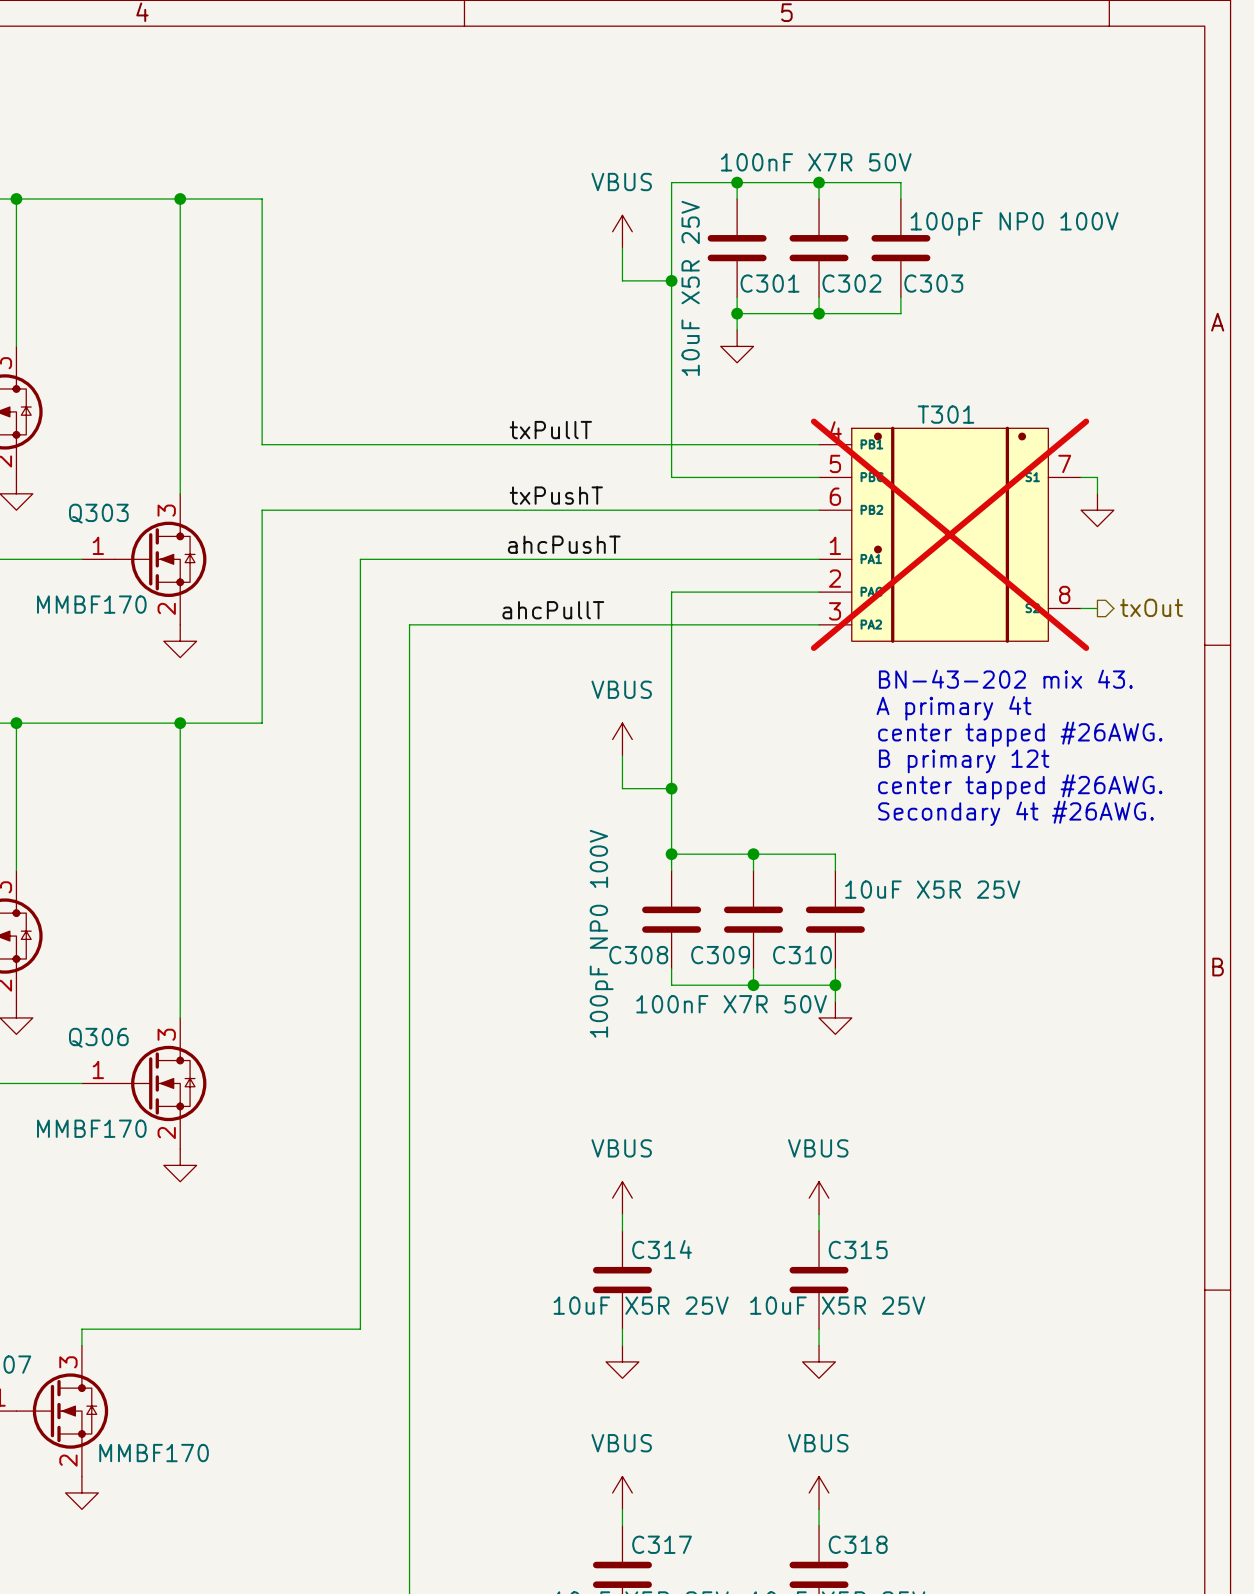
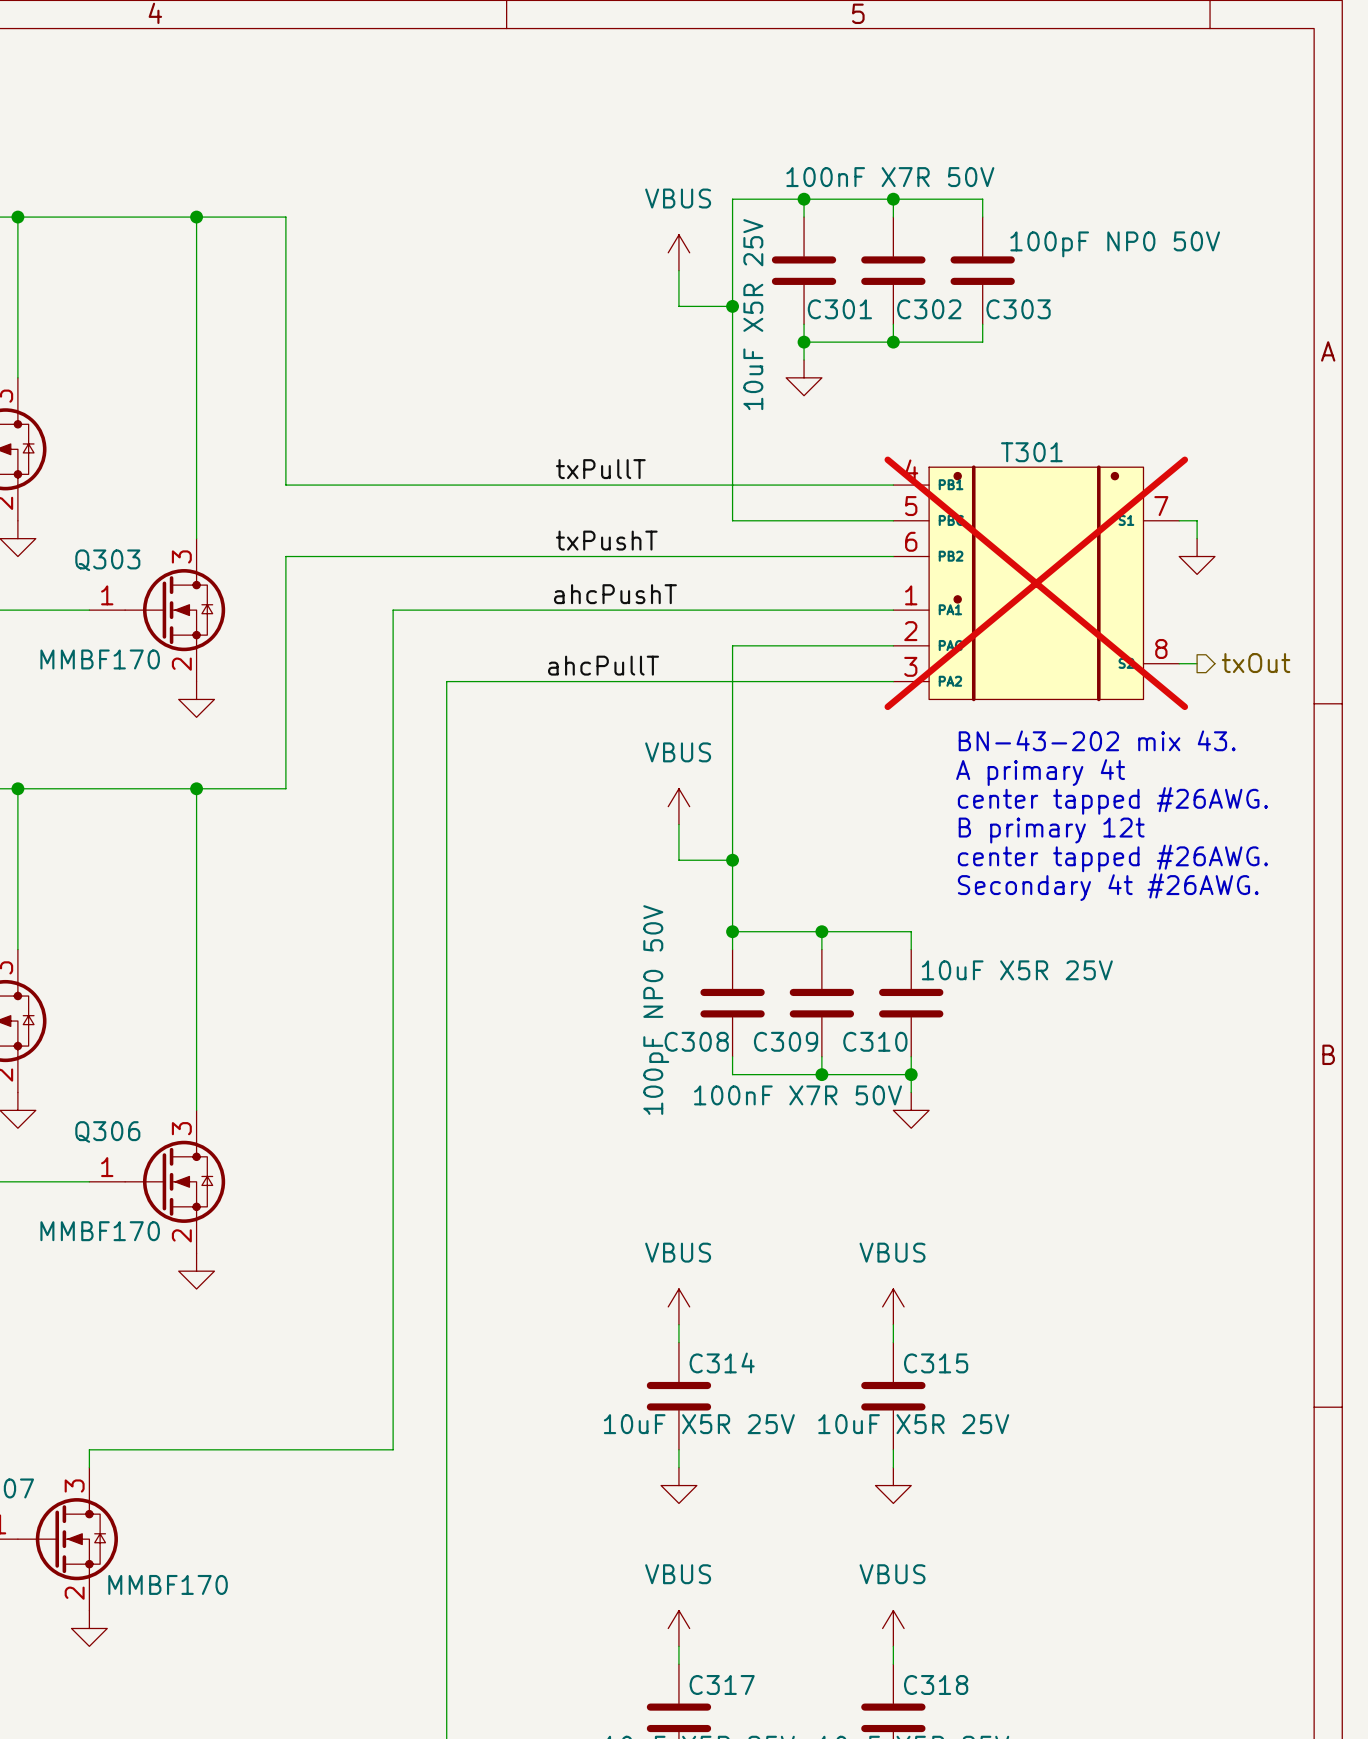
C303 value: 100pF NP0 100V (1014, 224) -> 100pF NP0 50V (1115, 244)
C308 value: 100pF NP0 100V (601, 933) -> 100pF NP0 50V (656, 1010)

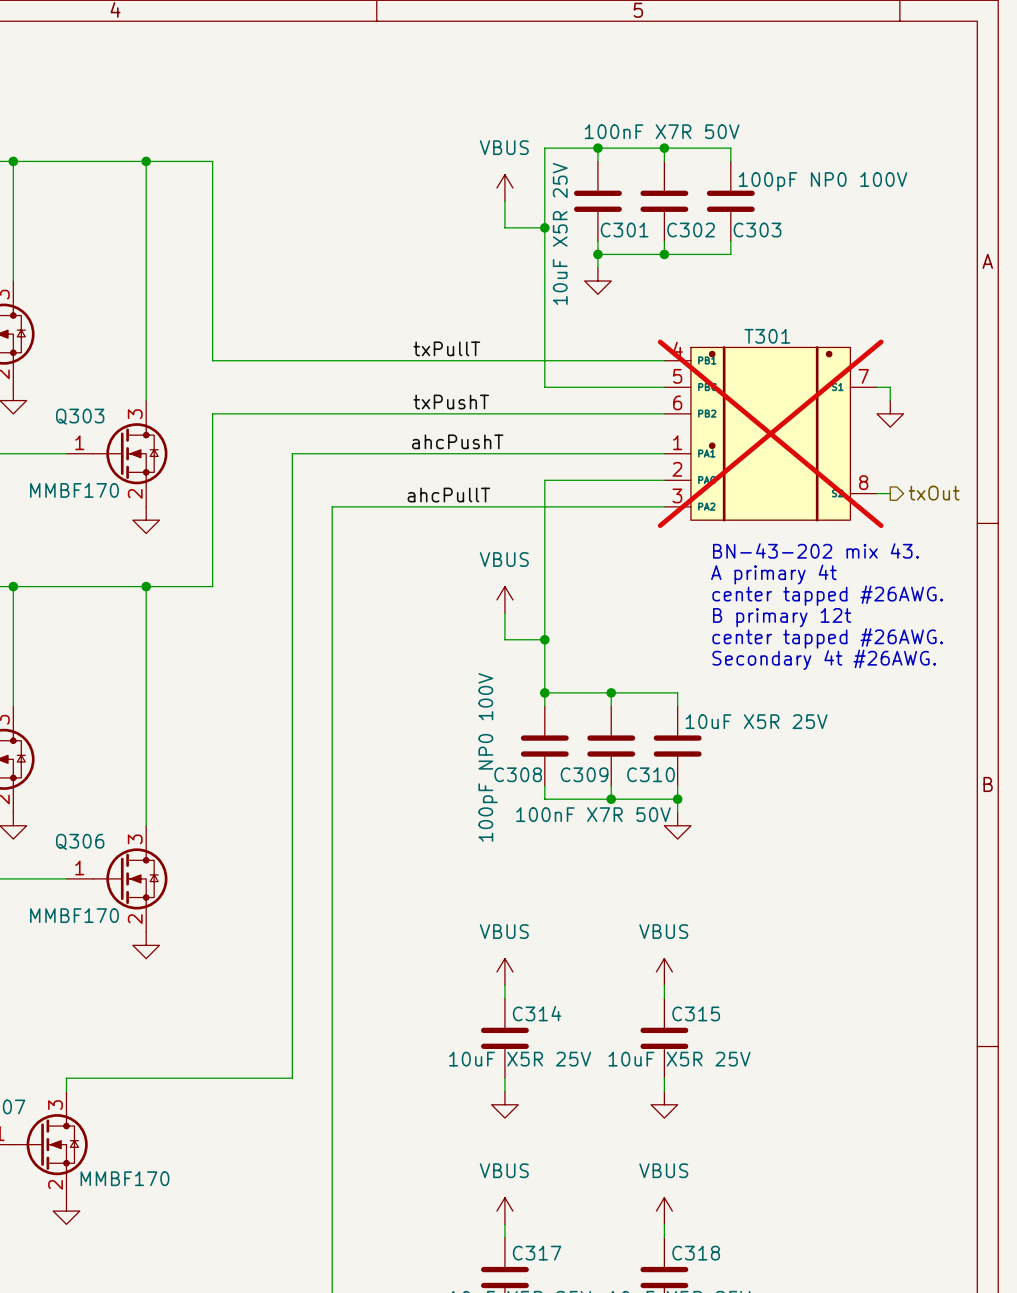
C303 value: 100pF NP0 50V (1115, 244) -> 100pF NP0 100V (823, 181)
C308 value: 100pF NP0 50V (656, 1010) -> 100pF NP0 100V (488, 757)

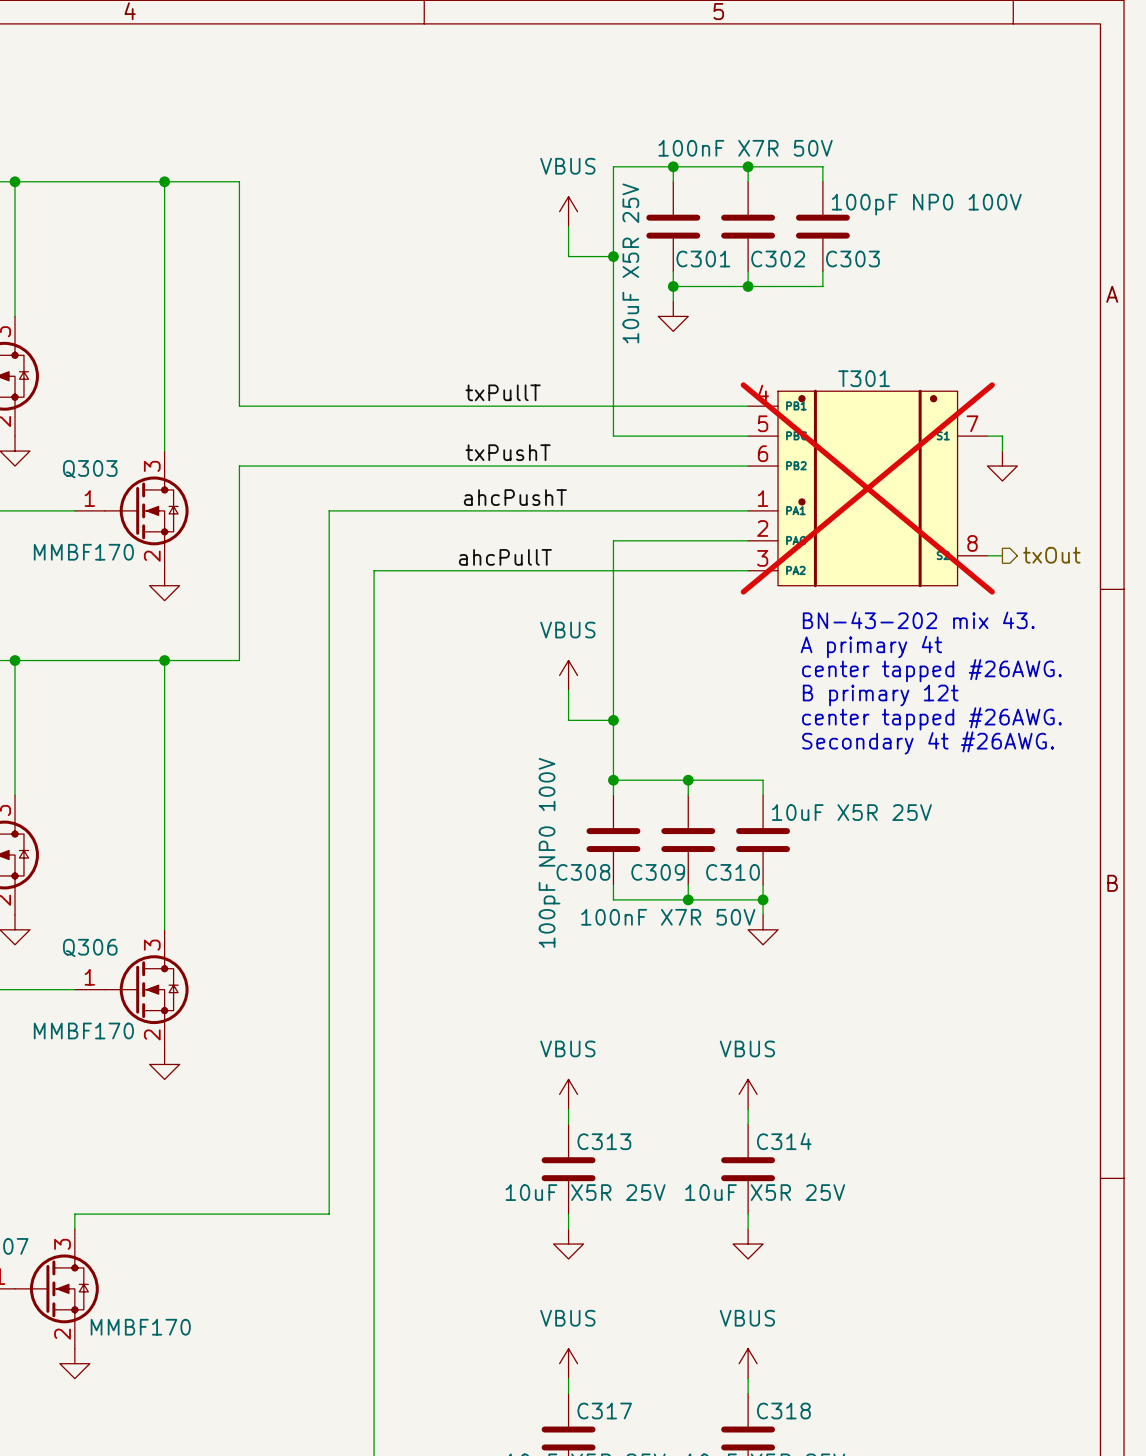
C314 name: C314 (537, 1013) -> C313 (604, 1141)
C315 name: C315 (696, 1013) -> C314 (784, 1141)

